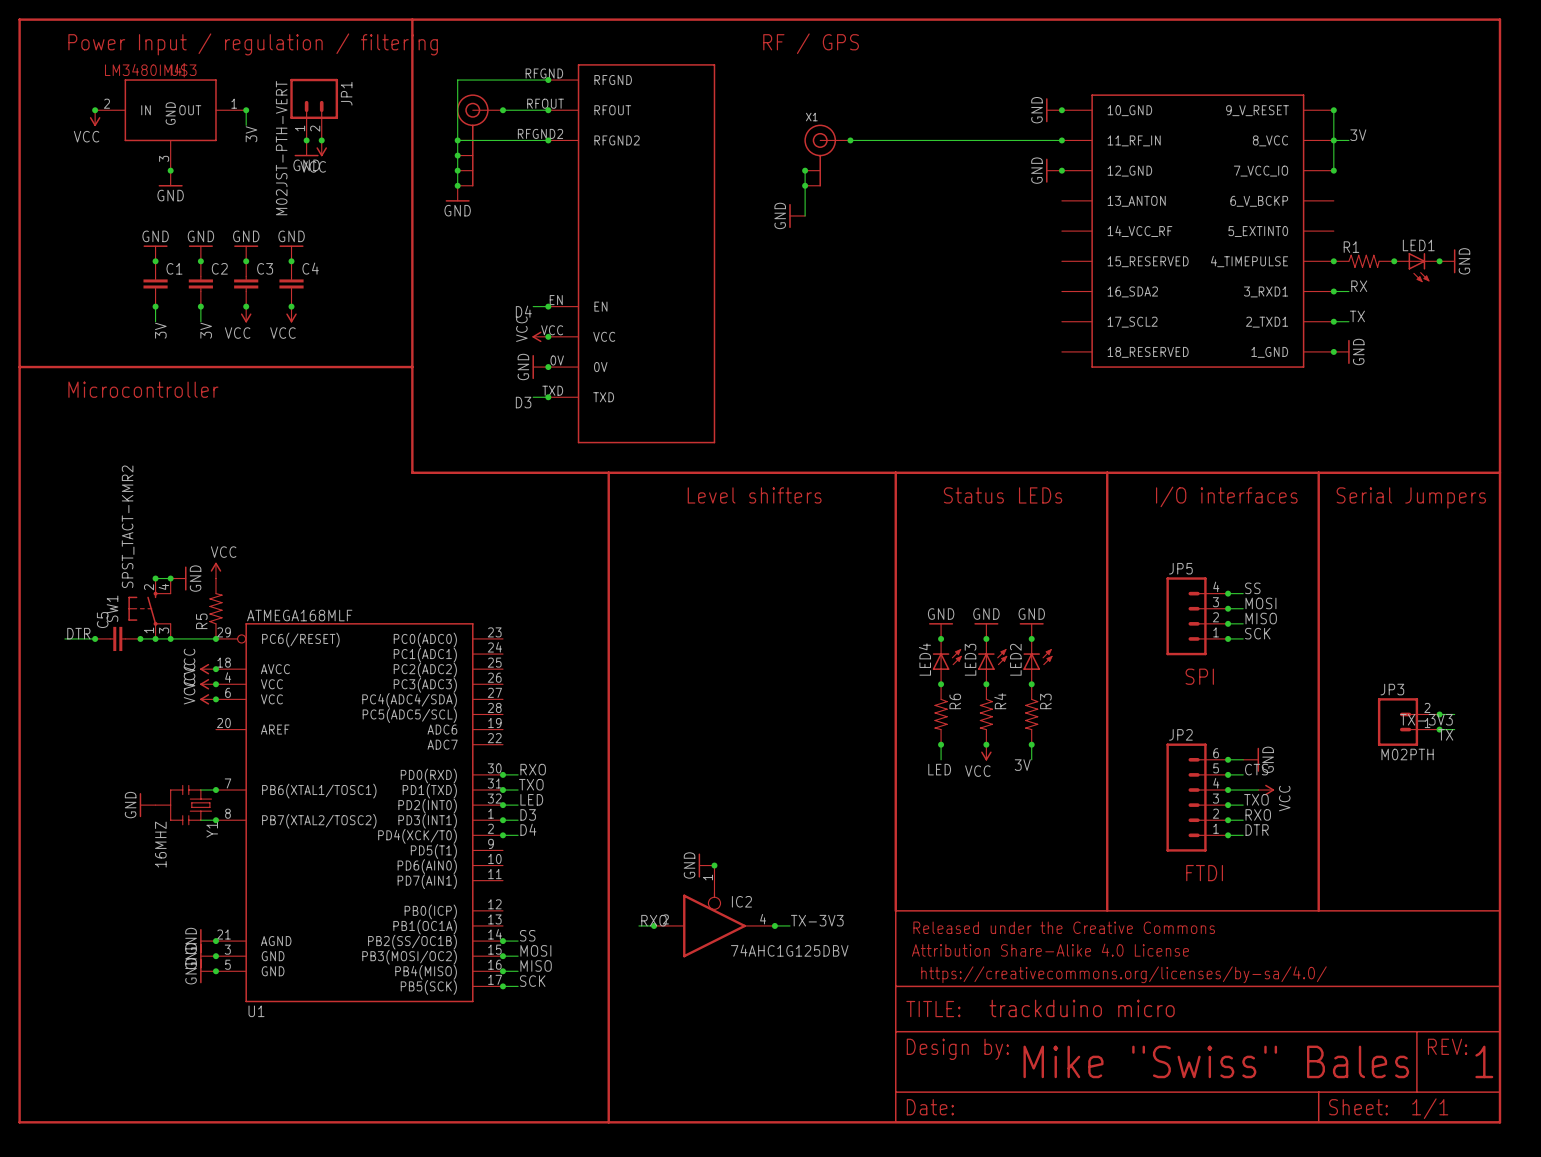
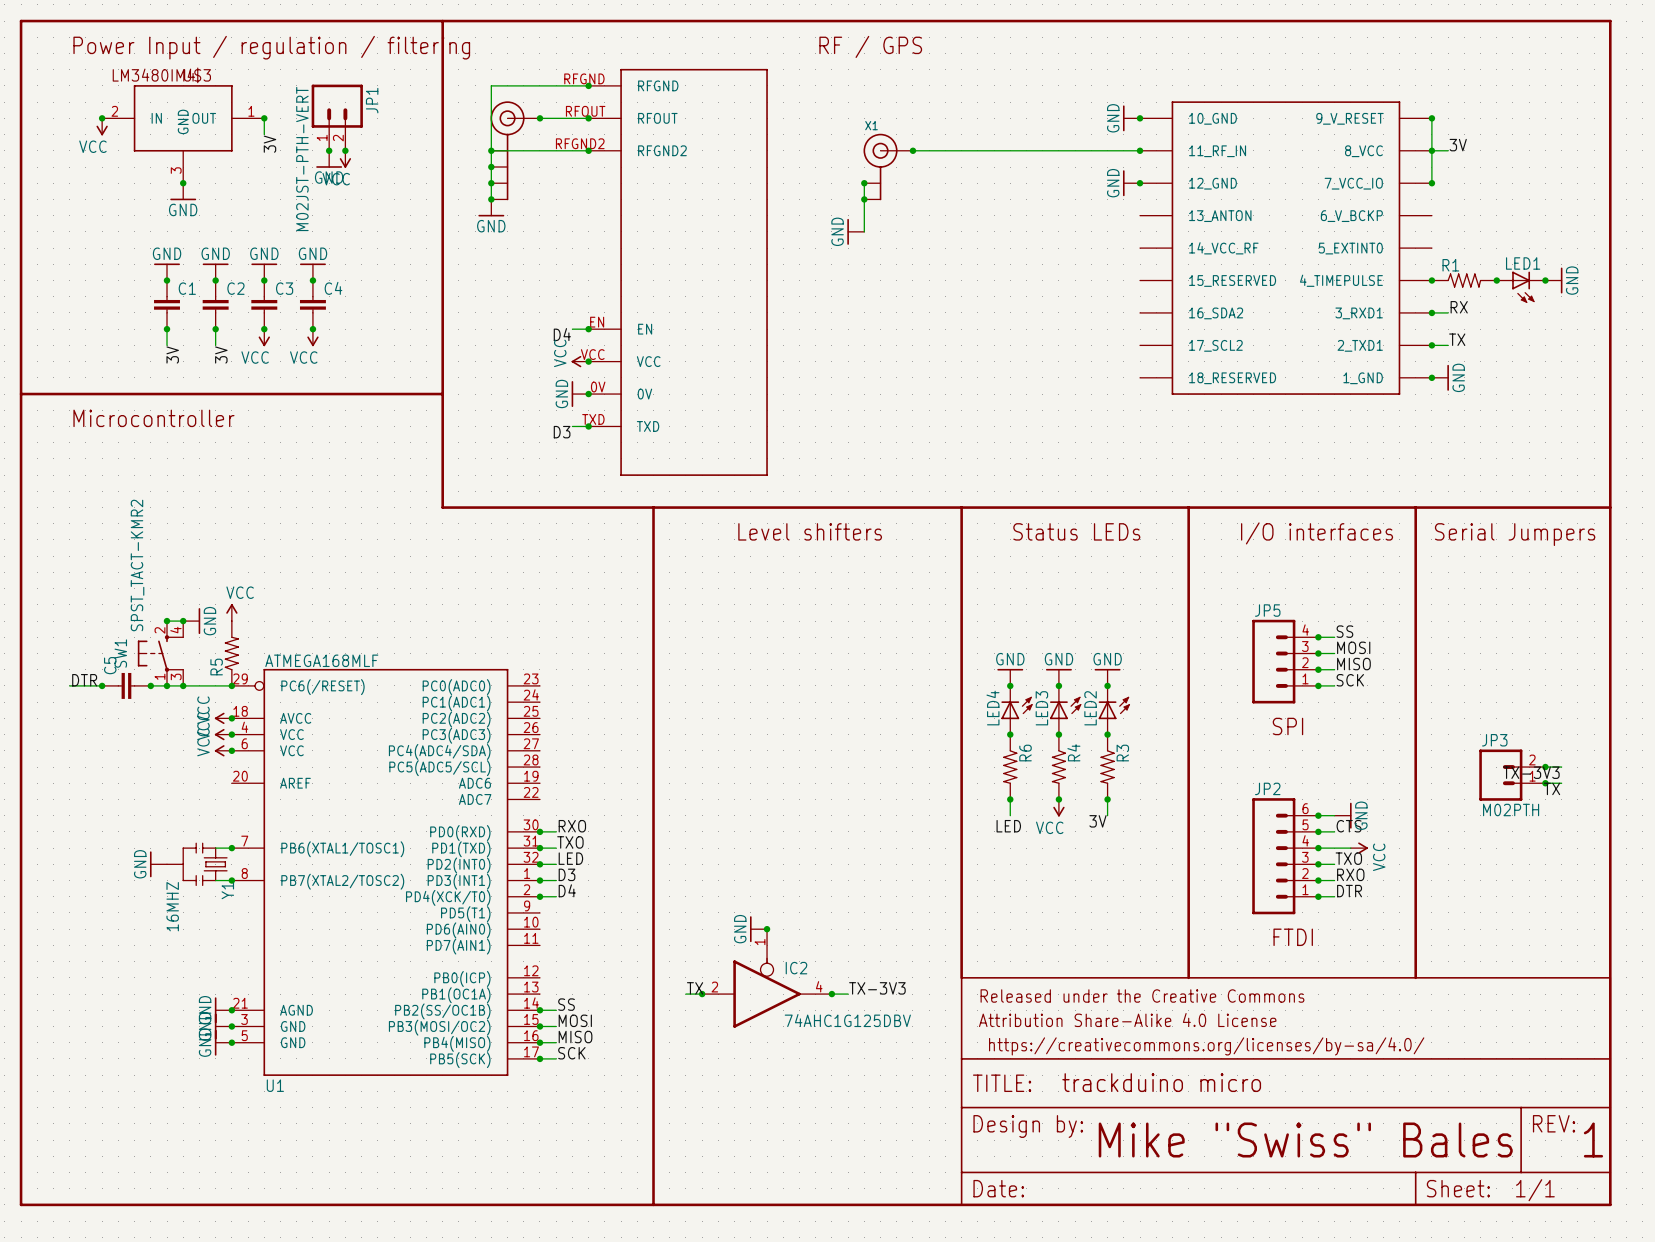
label: RXO (654, 920) -> TX (695, 988)

